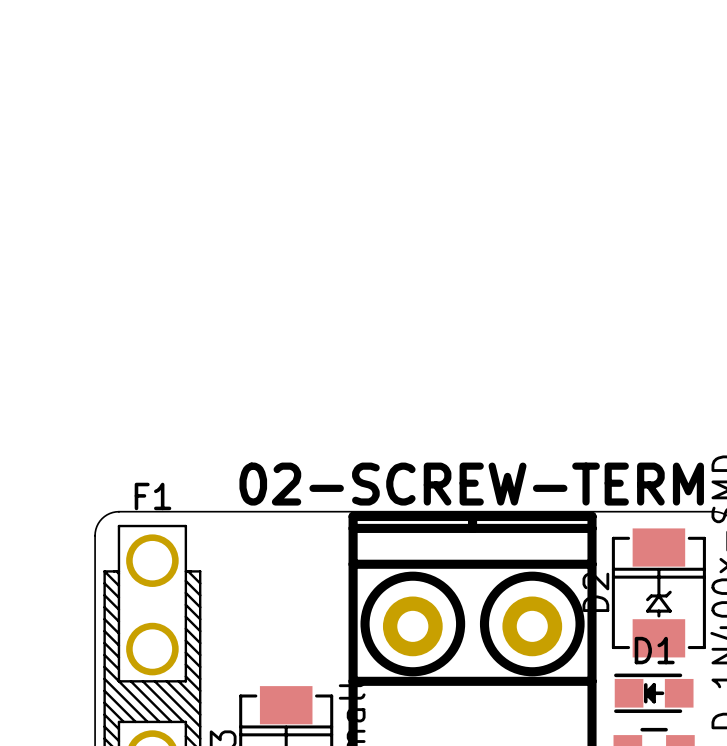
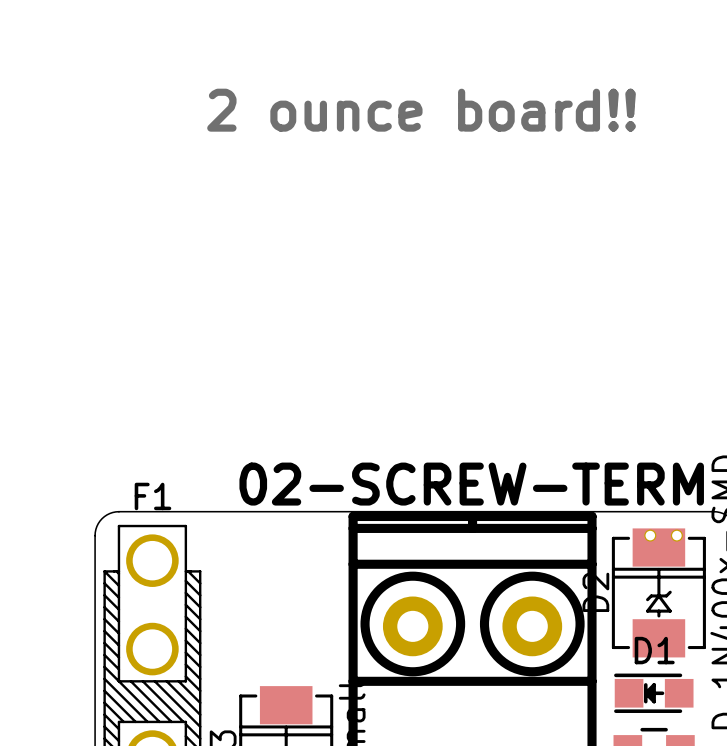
text: none -> 2 ounce board!! (421, 110)
part: none -> (650, 535)
part: none -> (676, 535)

